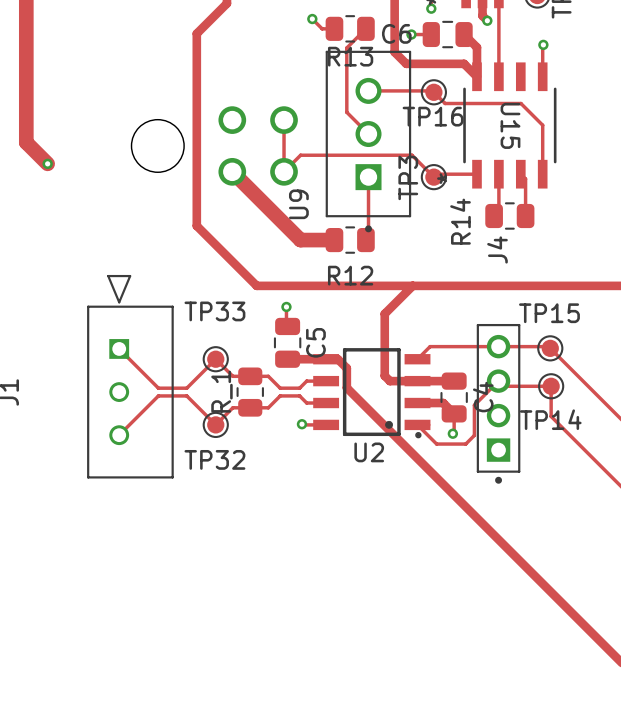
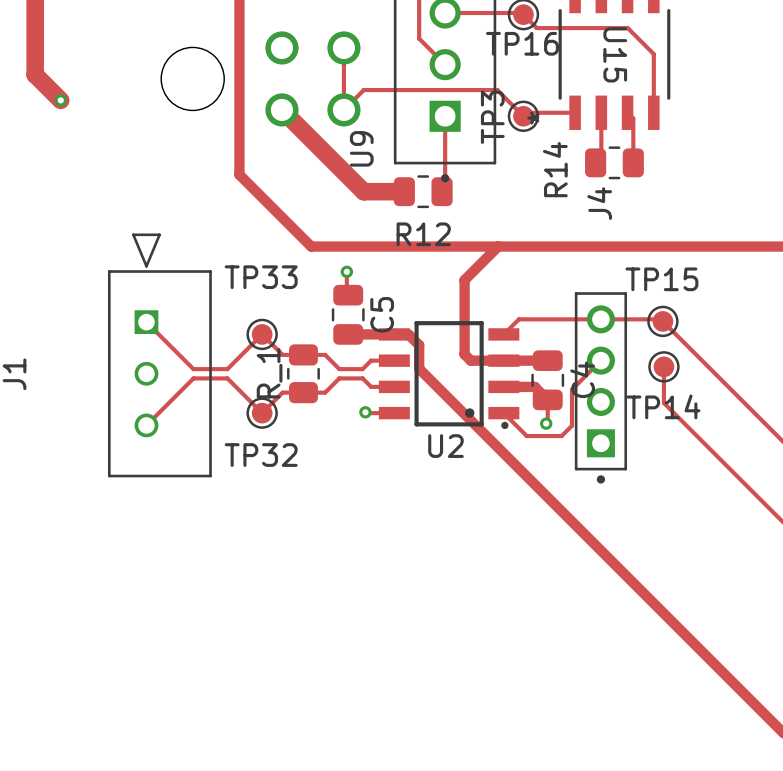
track: (498, 381) (503, 386) (551, 386) -> none

